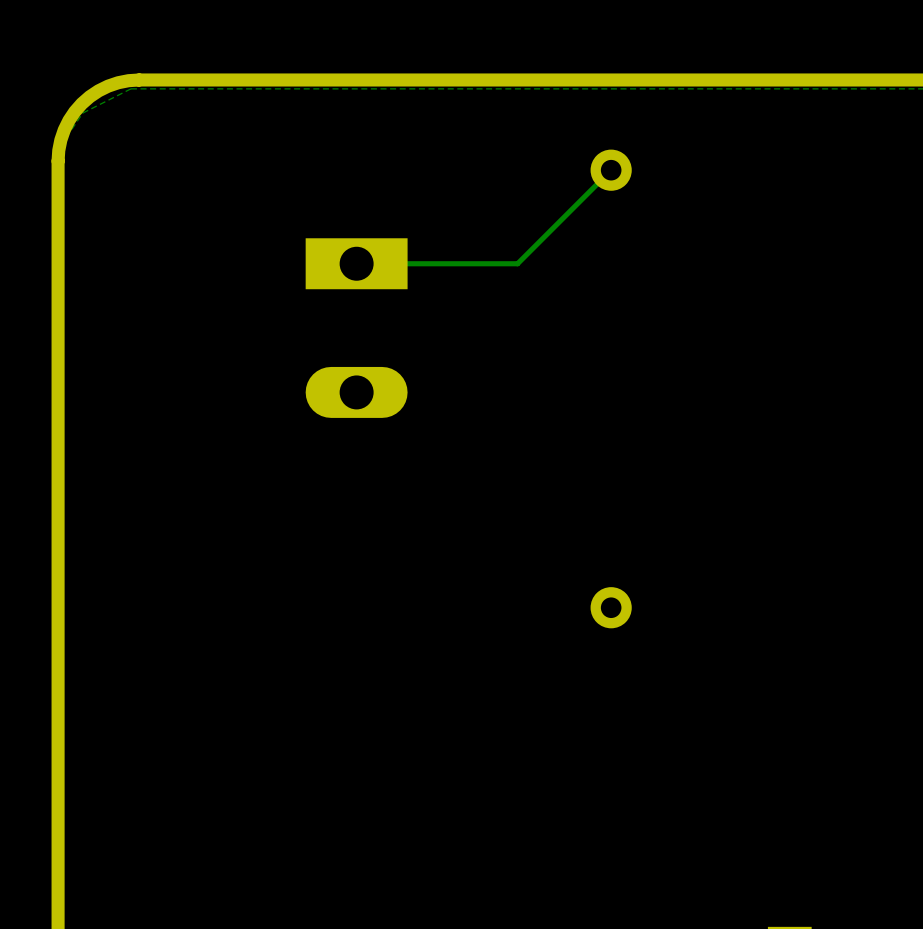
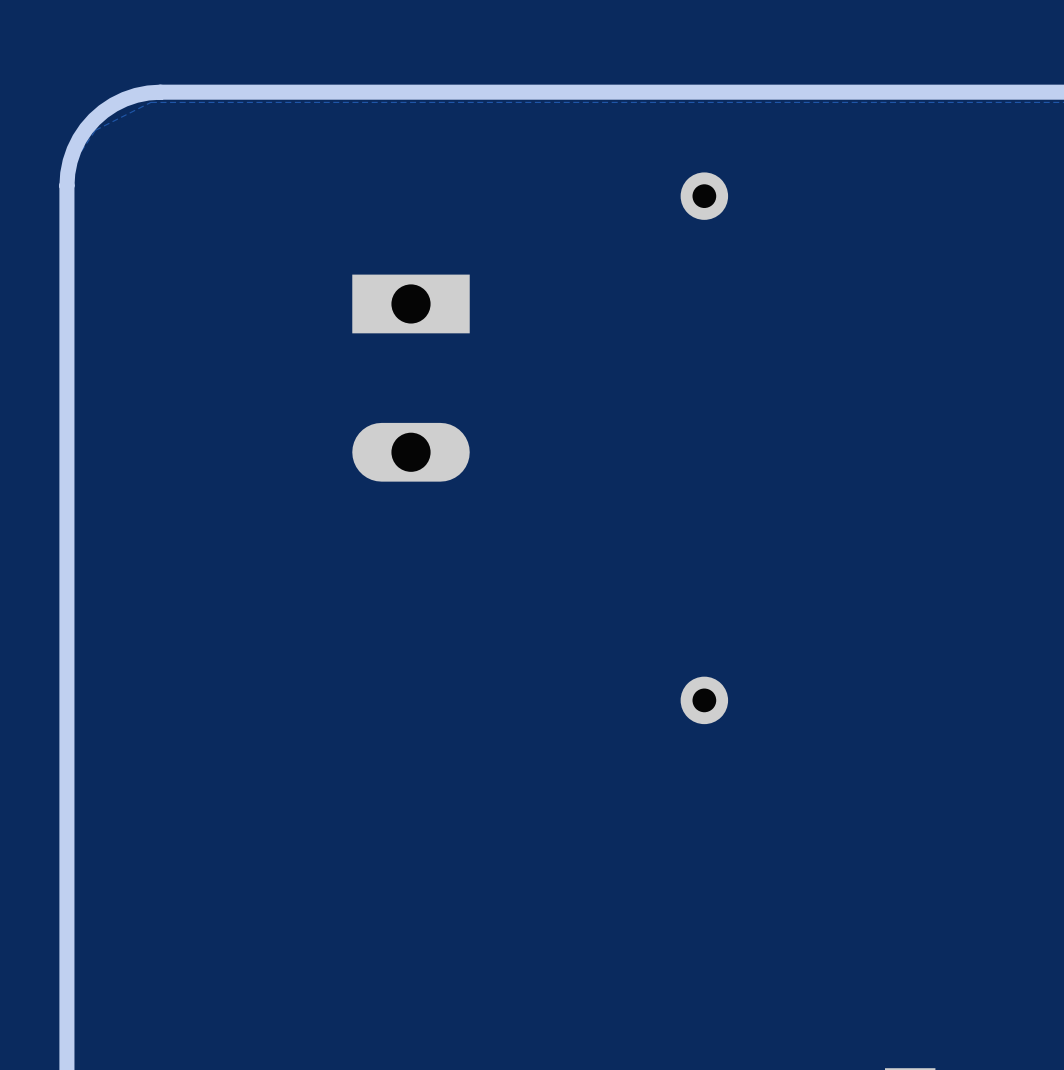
track: (611, 170) (517, 263) (356, 263) -> none

